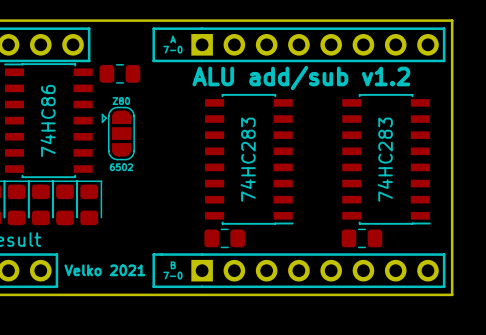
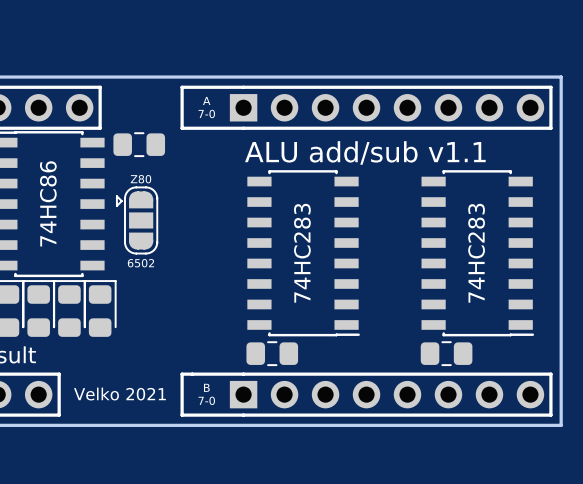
text: ALU add/sub v1.2 (301, 78) -> ALU add/sub v1.1 (365, 152)

